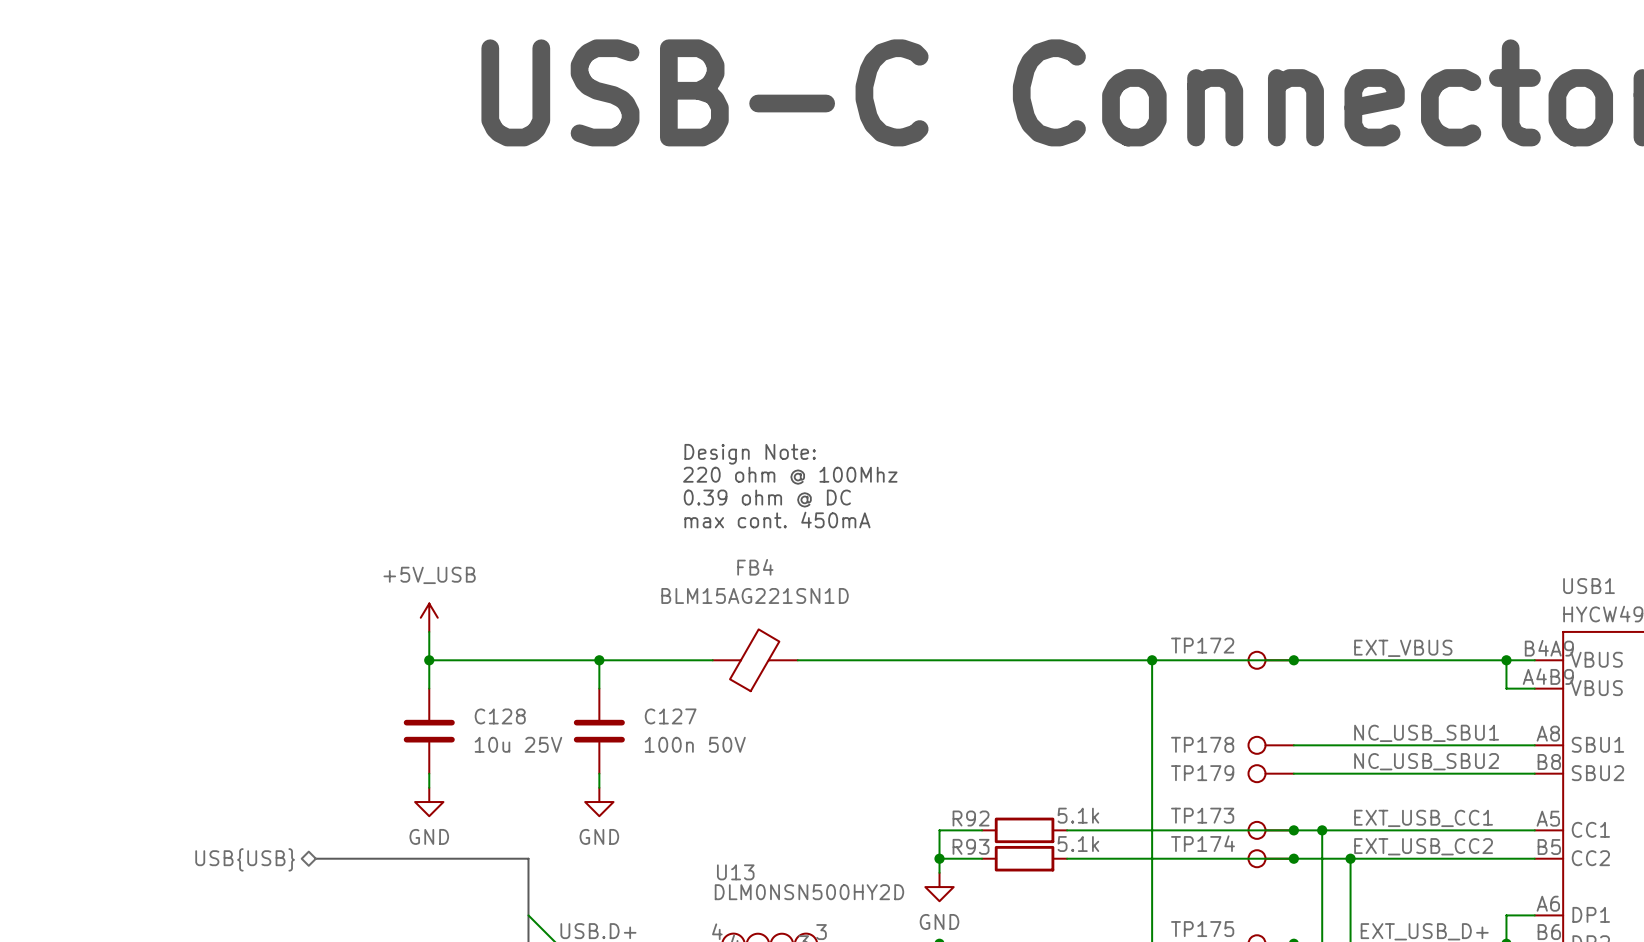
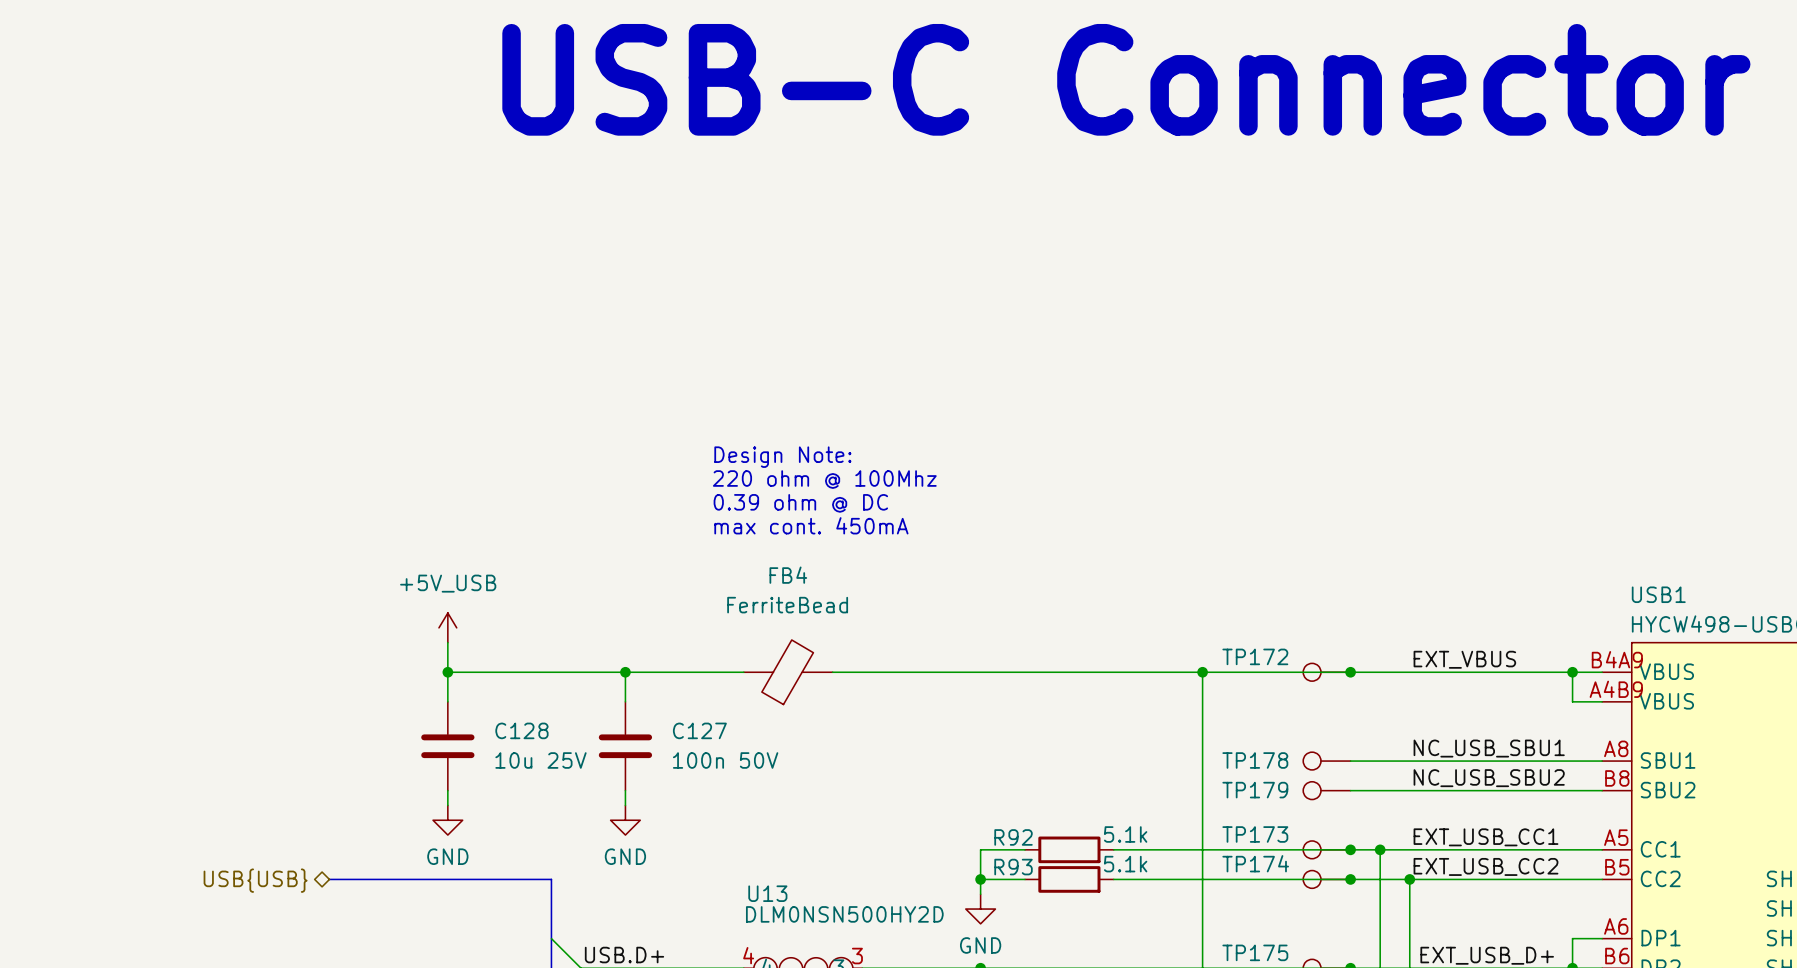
FB4 value: BLM15AG221SN1D (755, 595) -> FerriteBead (787, 605)

